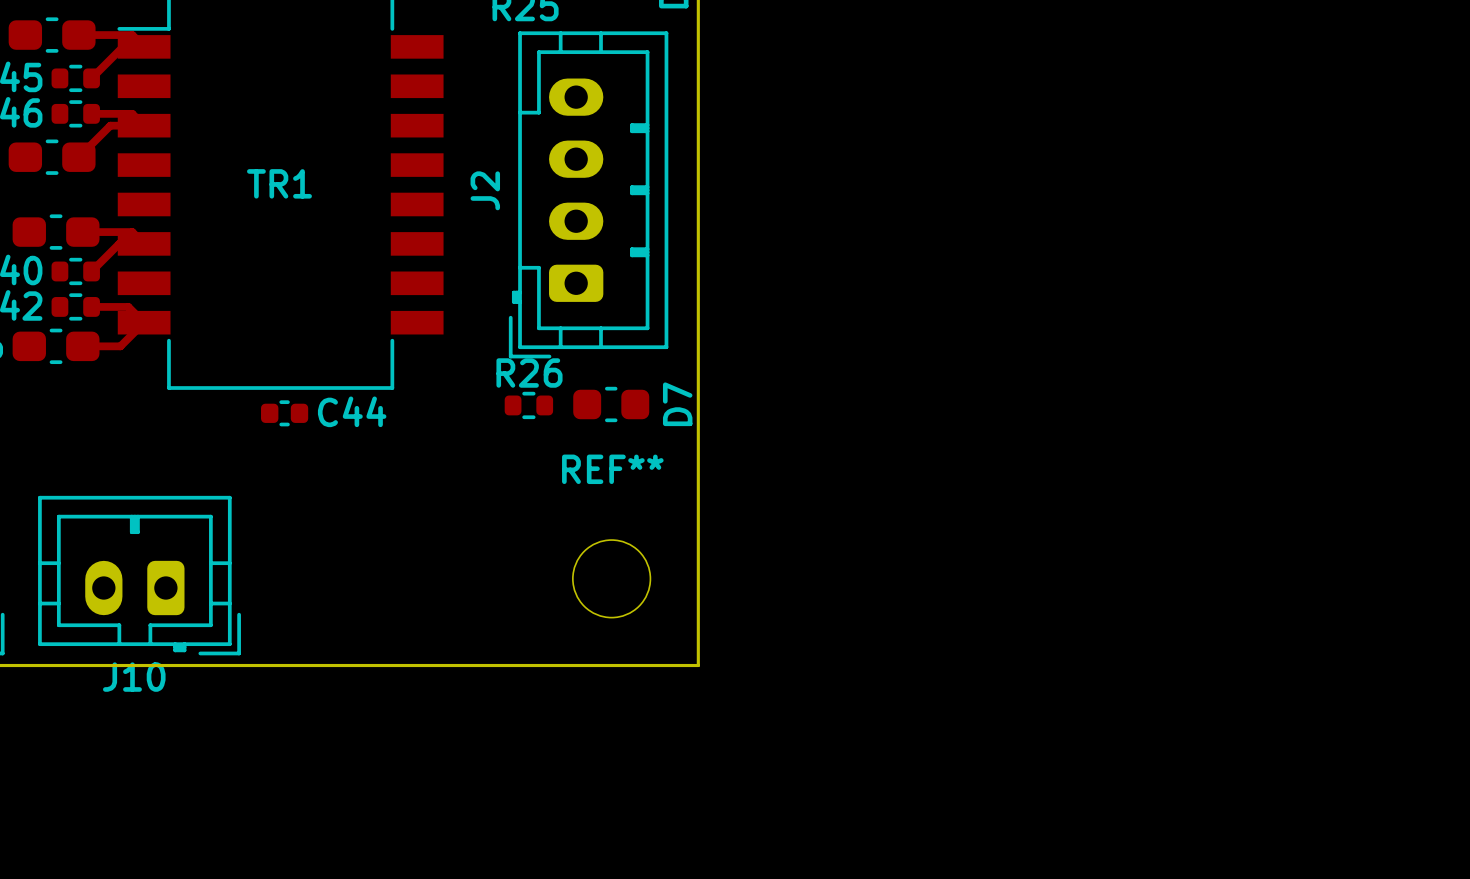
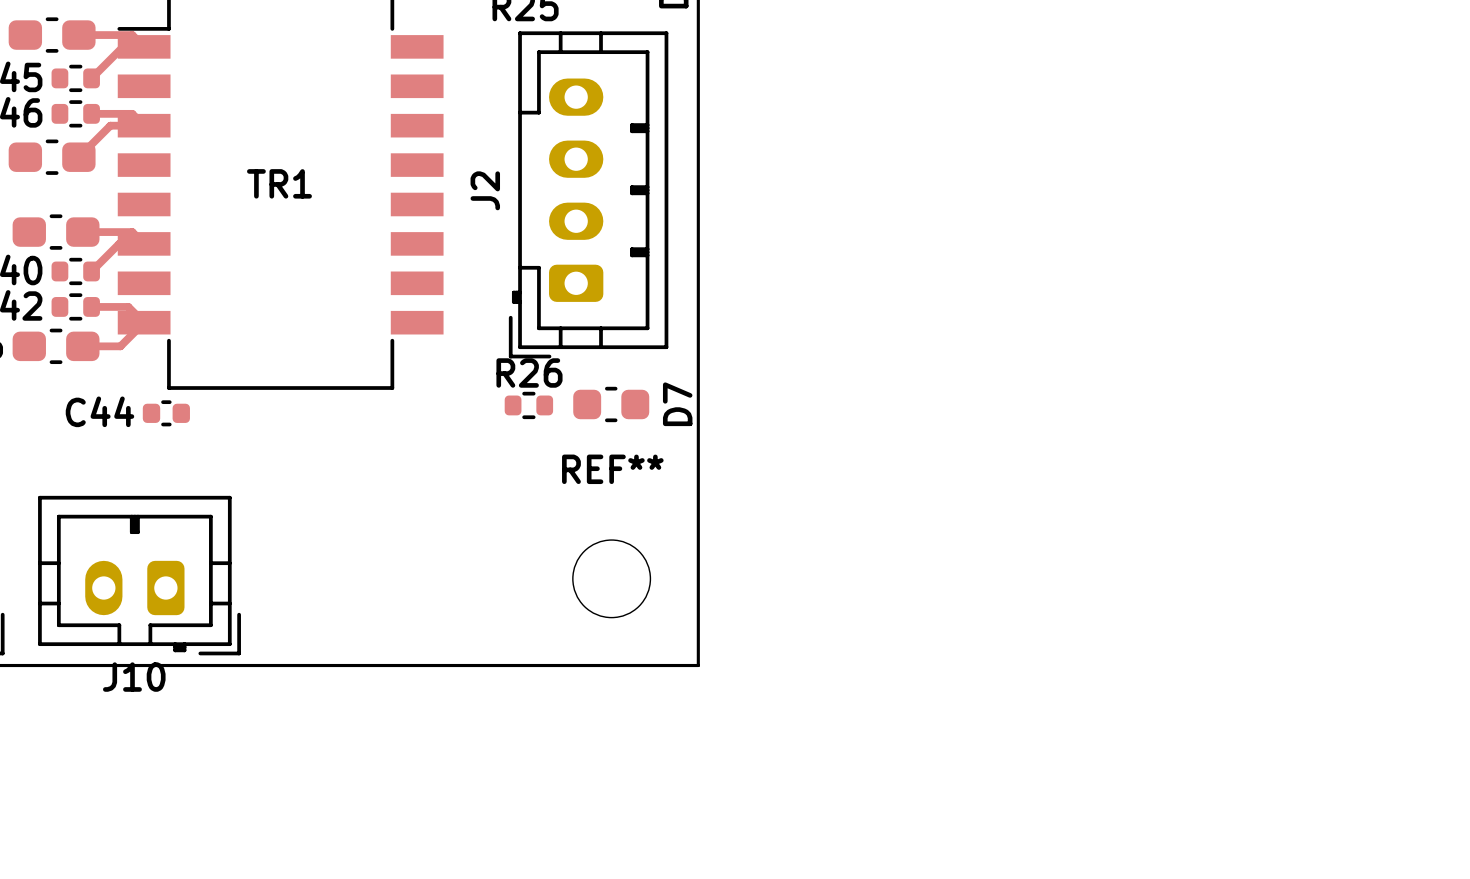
C44 name position: C44 (352, 411) -> C44 (99, 411)
C44 position: (284, 413) -> (166, 413)

